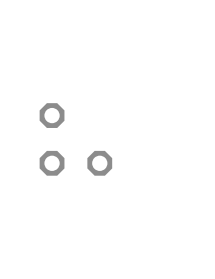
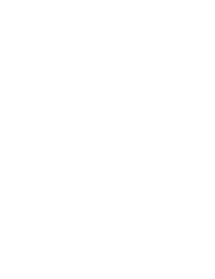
part: (75, 139) -> none

